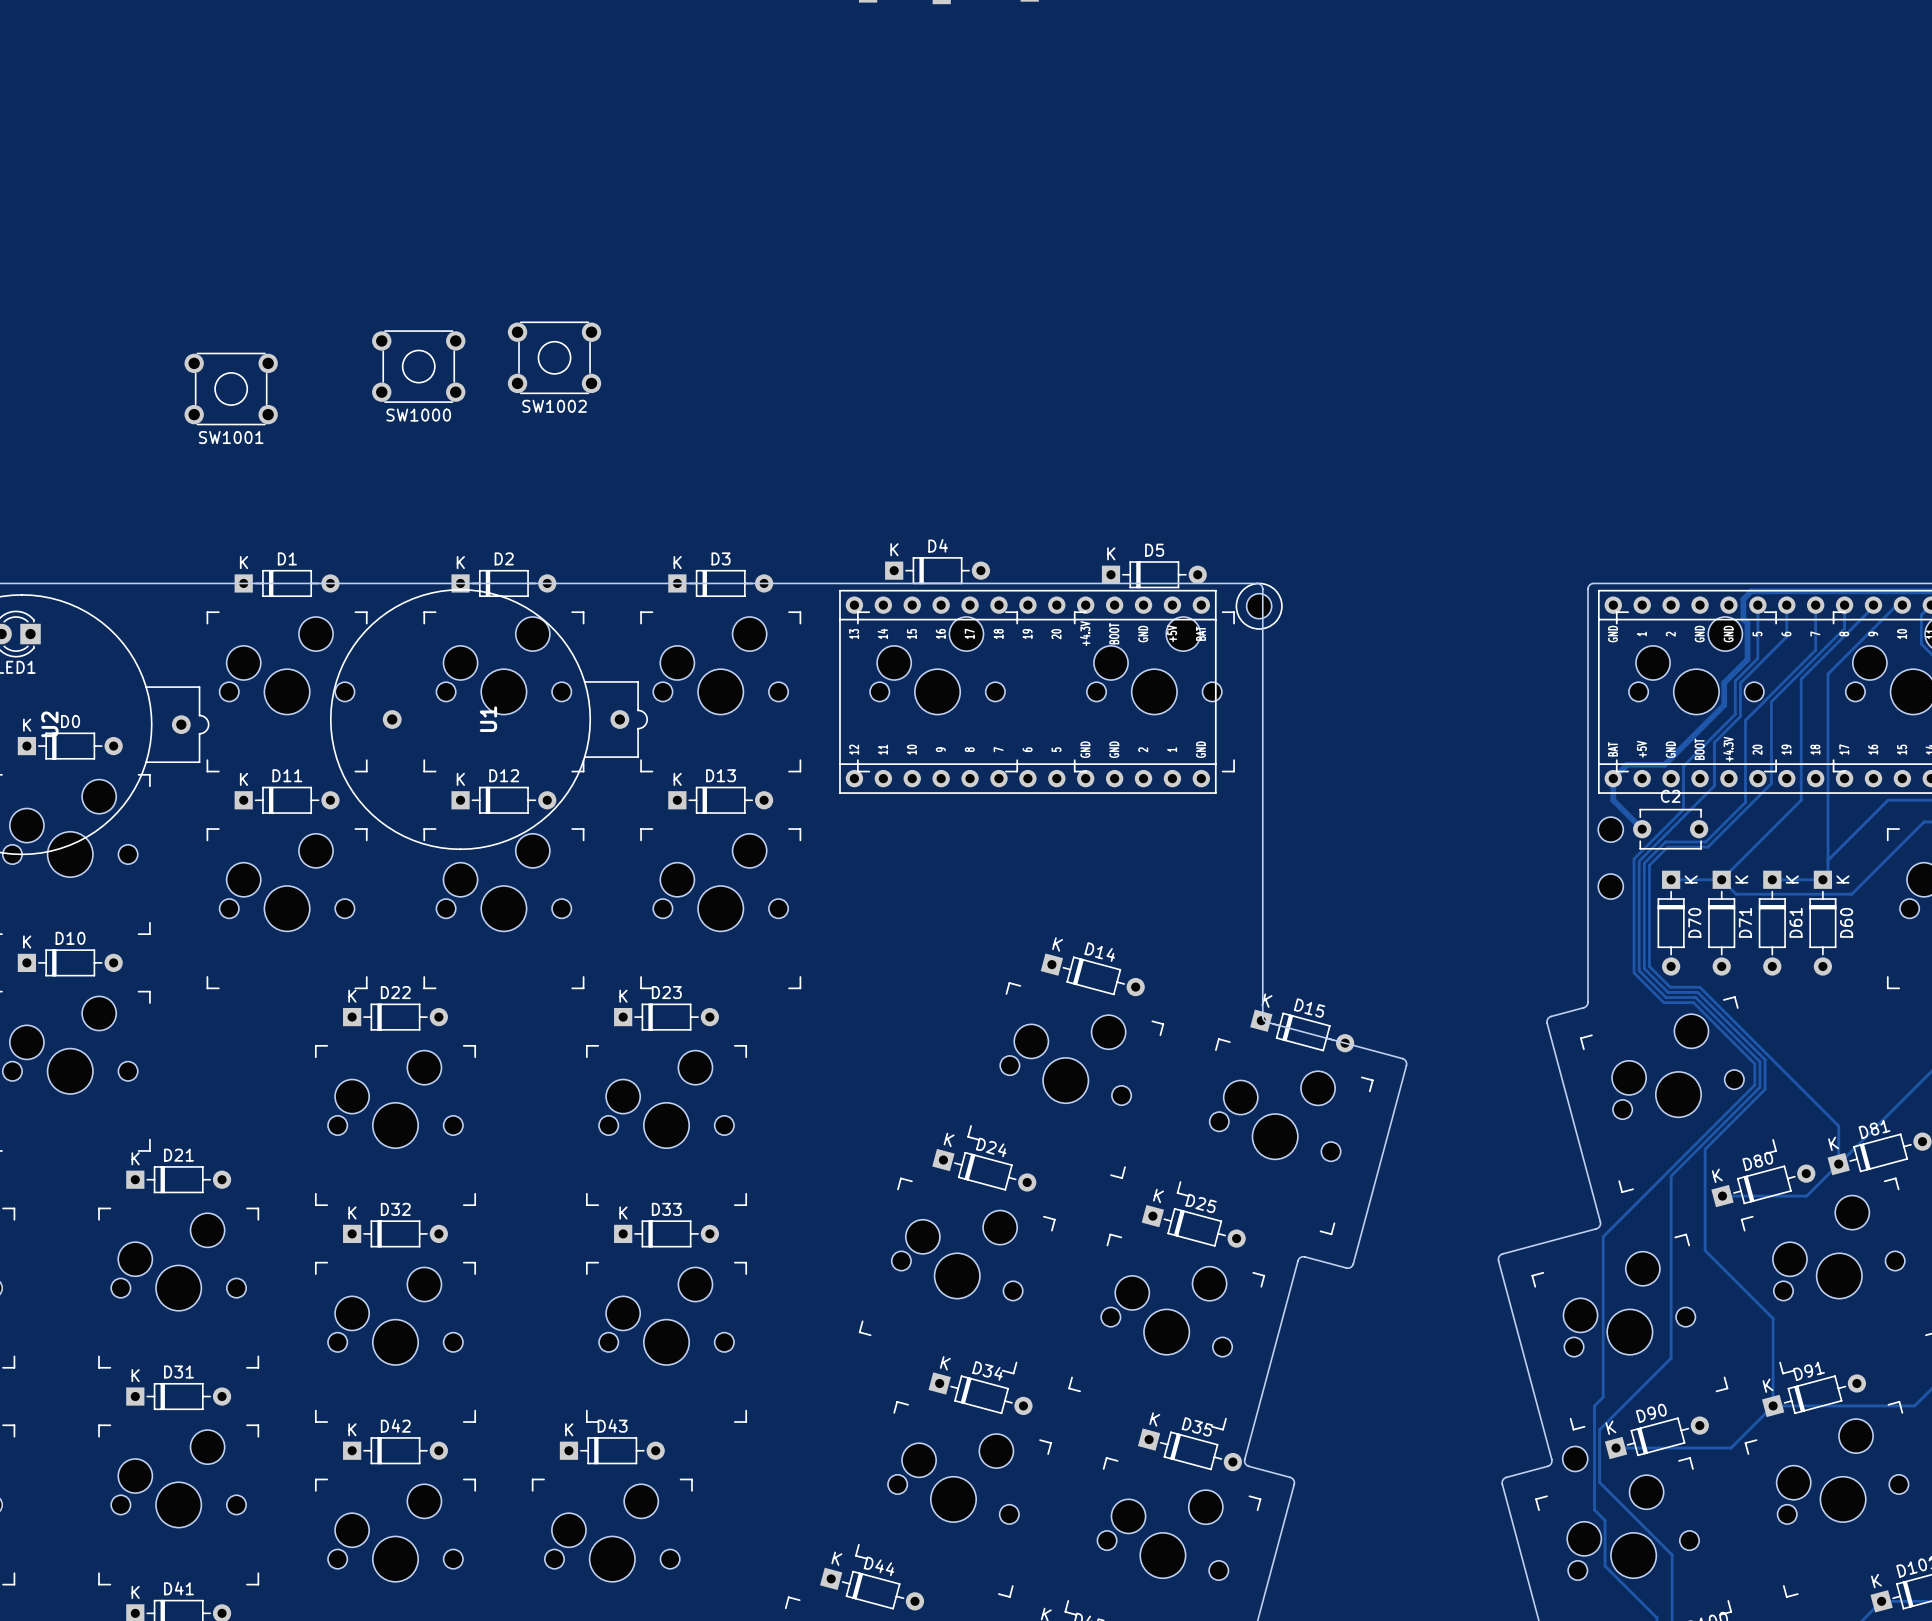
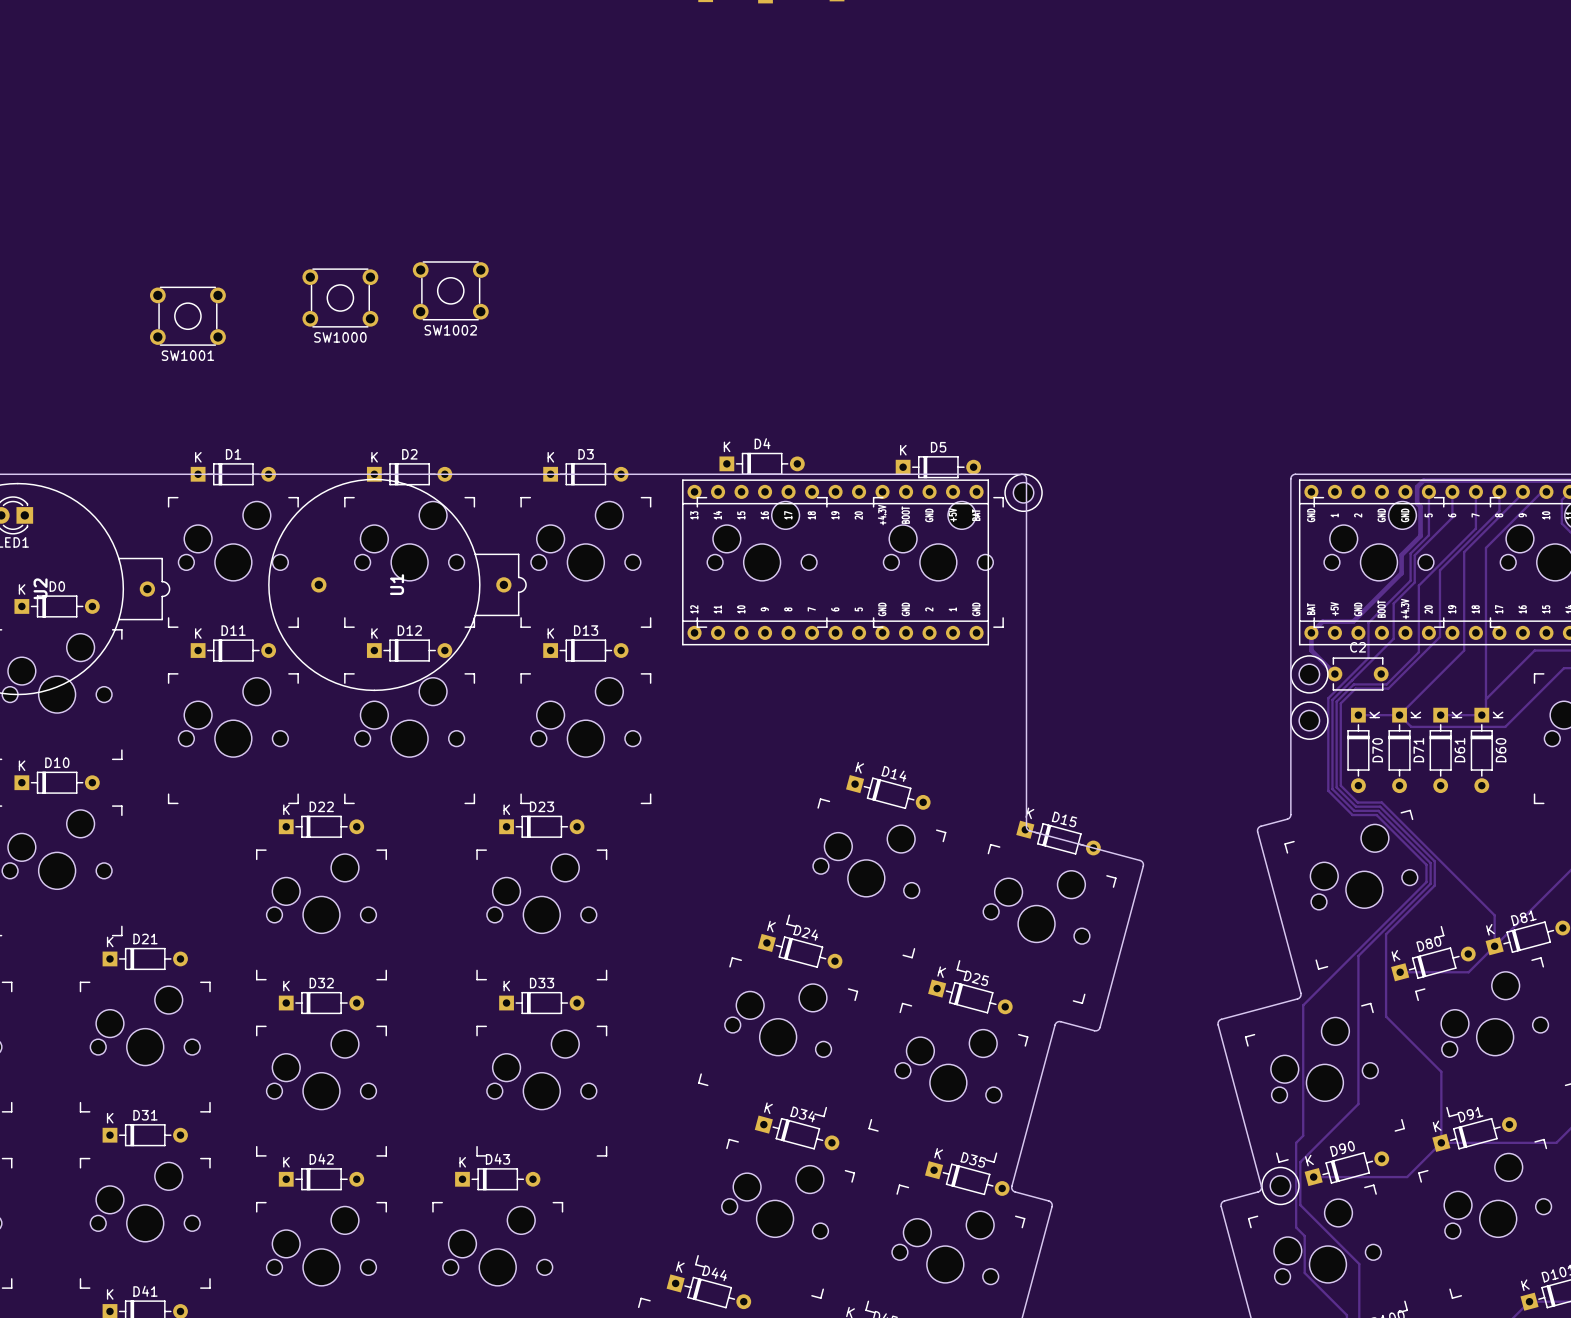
part footprint: [1598, 817, 1624, 843] -> [1290, 655, 1329, 694]
part footprint: [1598, 874, 1624, 900] -> [1290, 701, 1329, 740]
part footprint: [1562, 1446, 1588, 1472] -> [1261, 1167, 1300, 1205]

